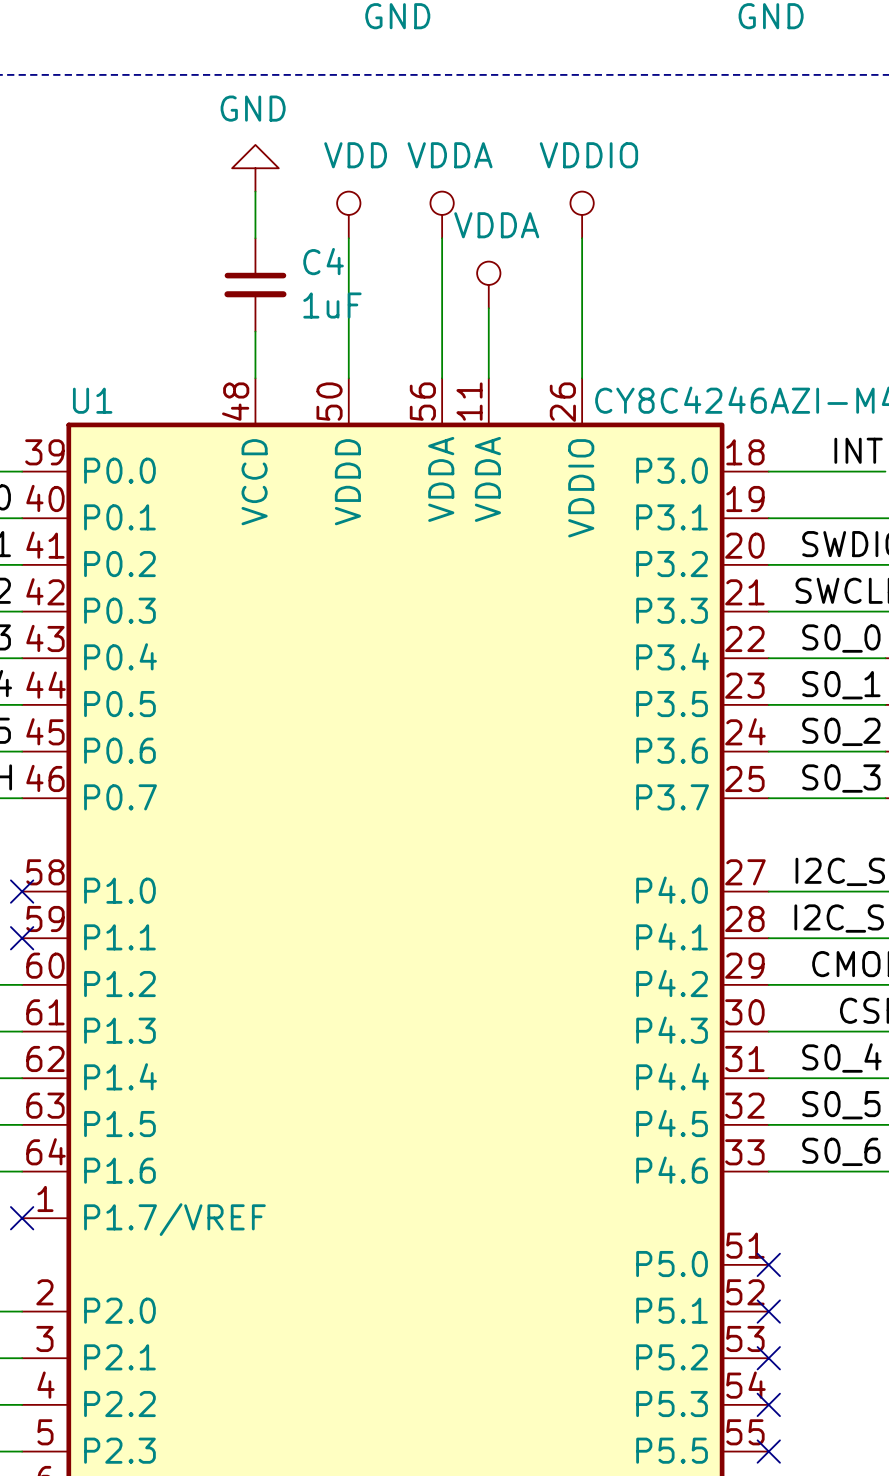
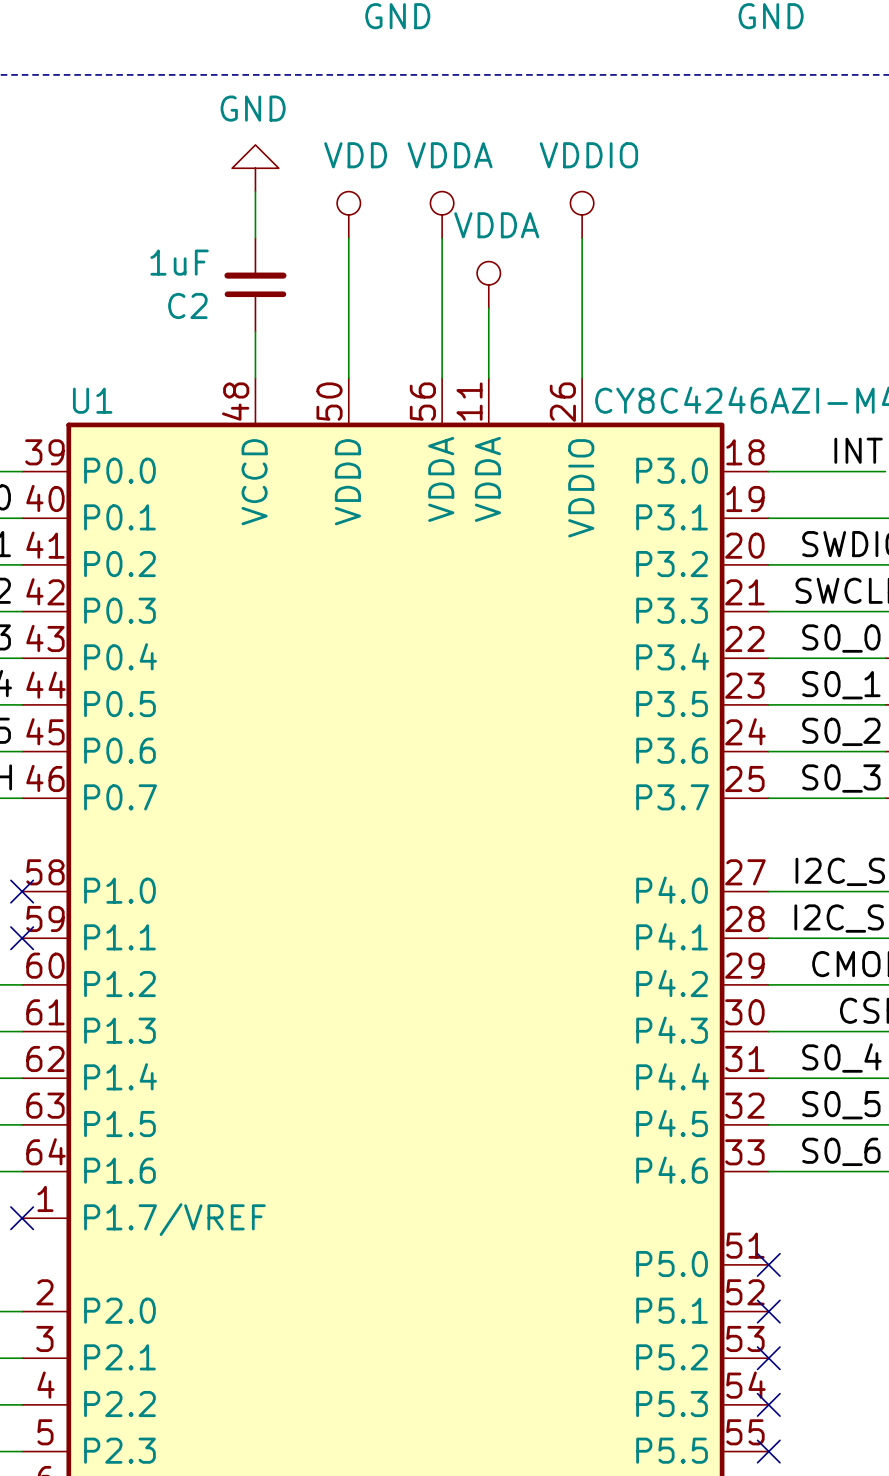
C4: 1uF (255, 284) -> none
C2: none -> 1uF (255, 284)

